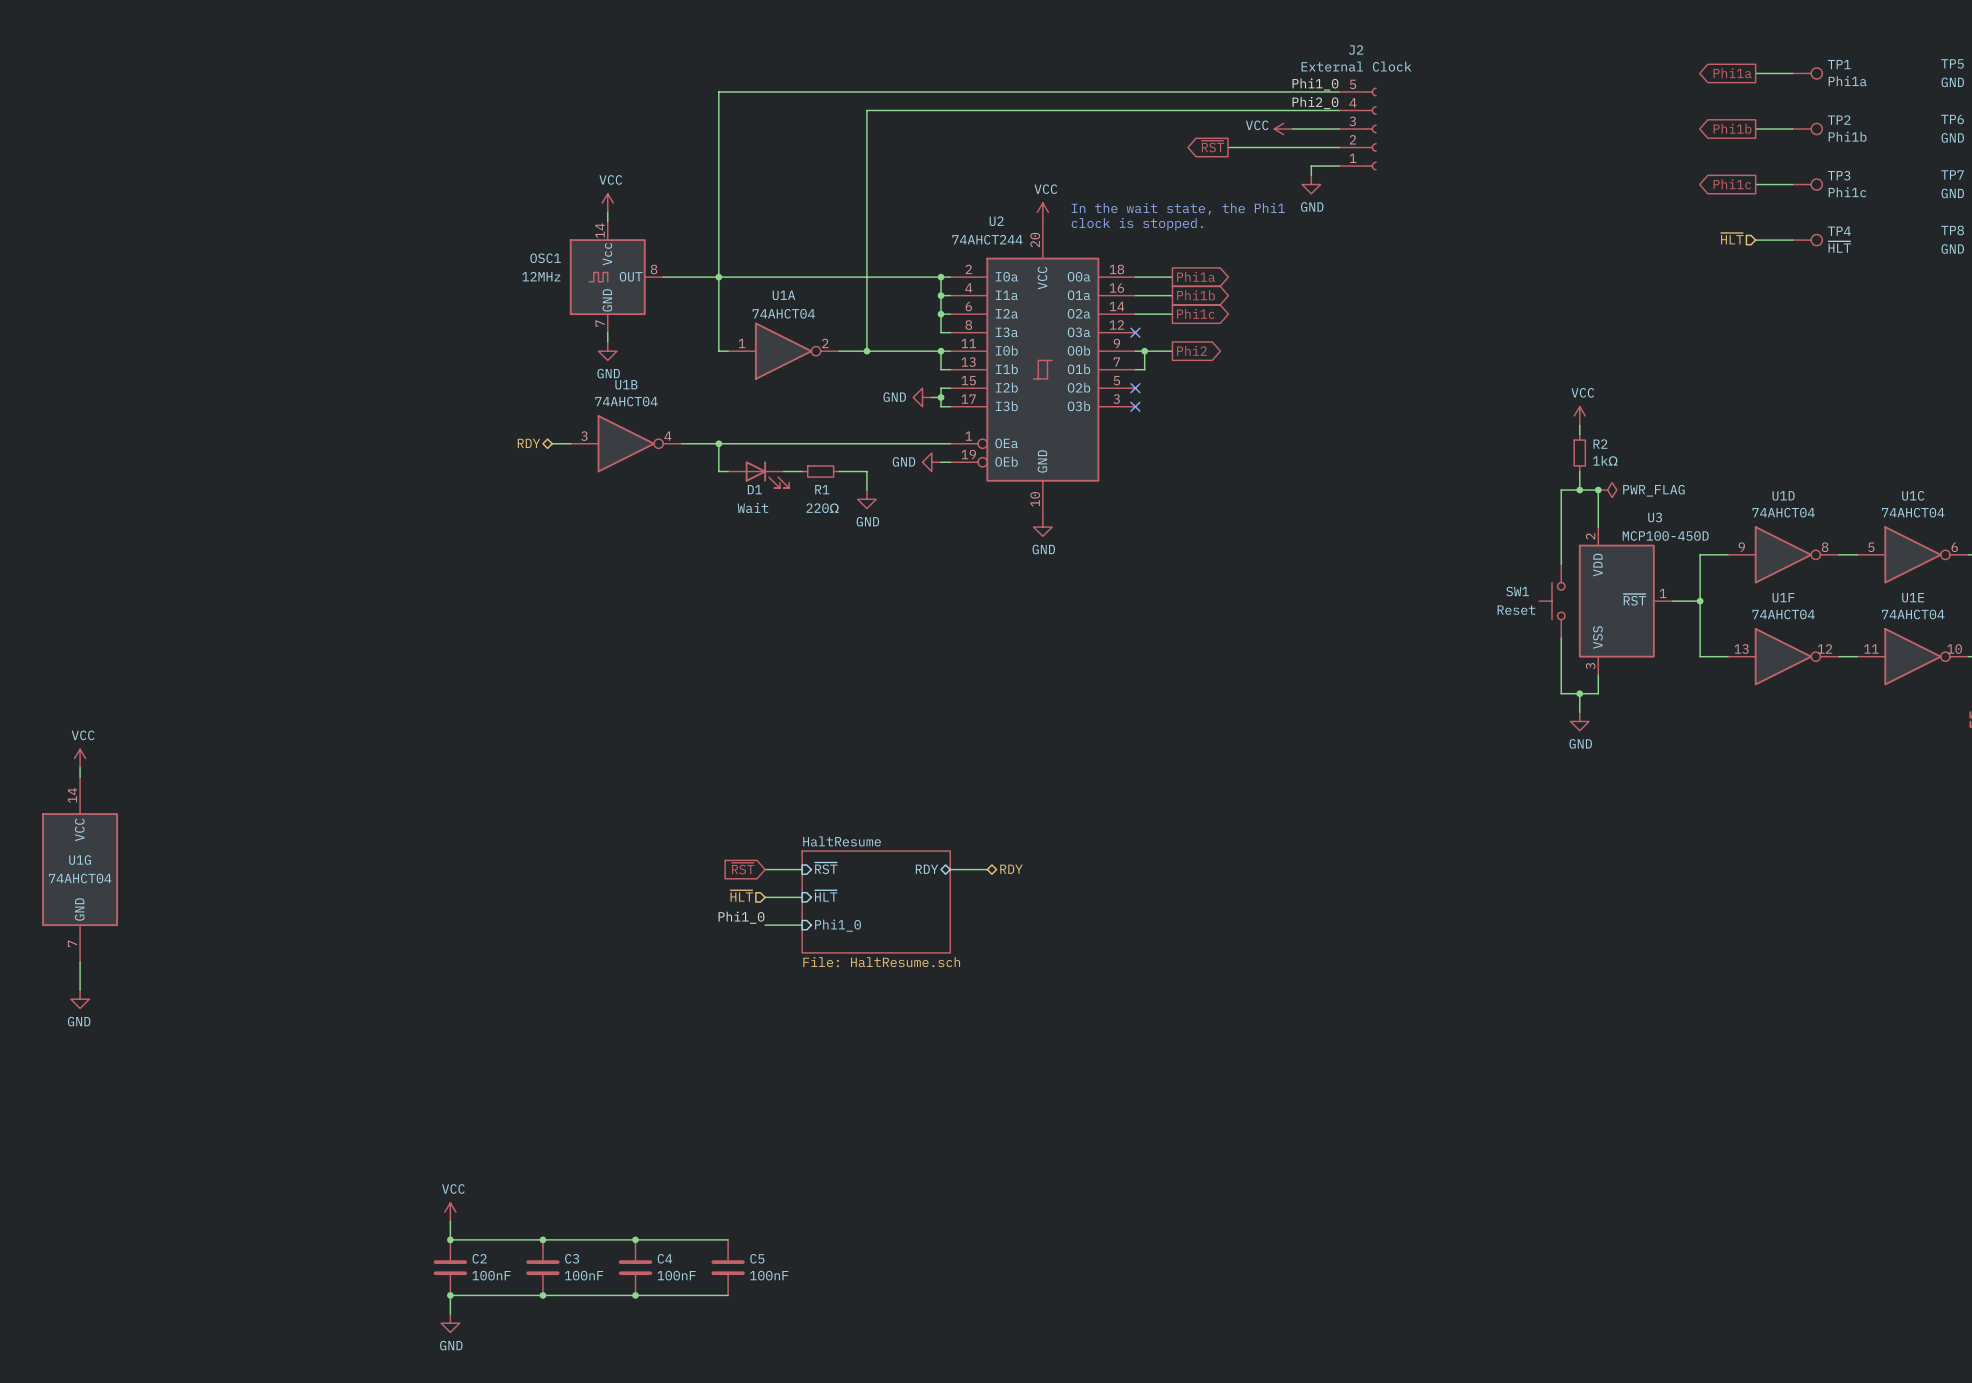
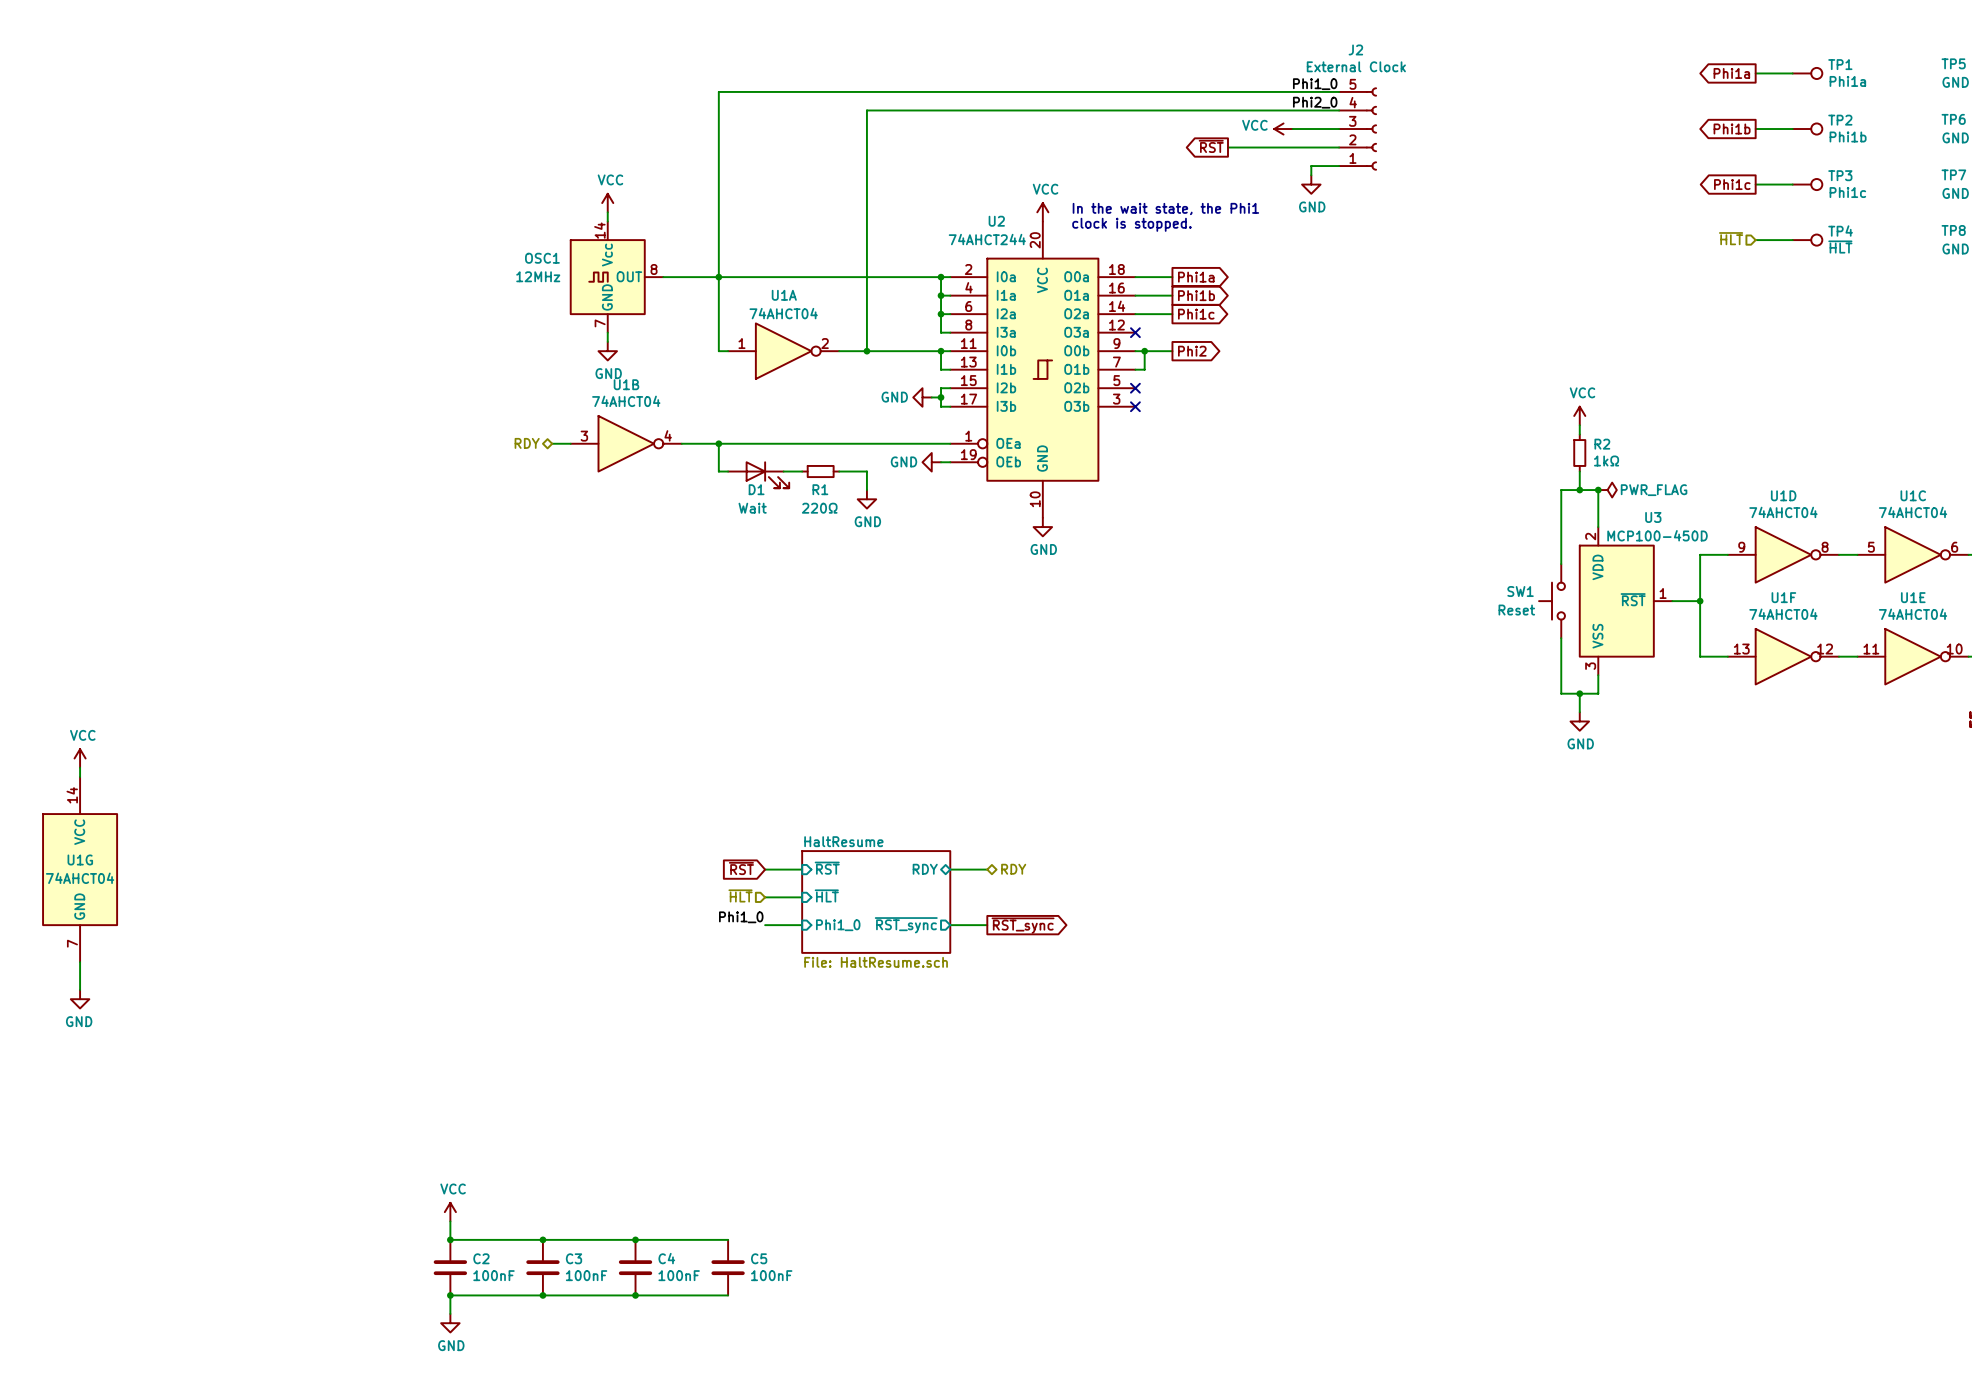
sheet pin: none -> ~{RST_sync} (906, 925)
wire: none -> (950, 925) (987, 925)
global label: none -> ~{RST_sync} (1023, 925)

